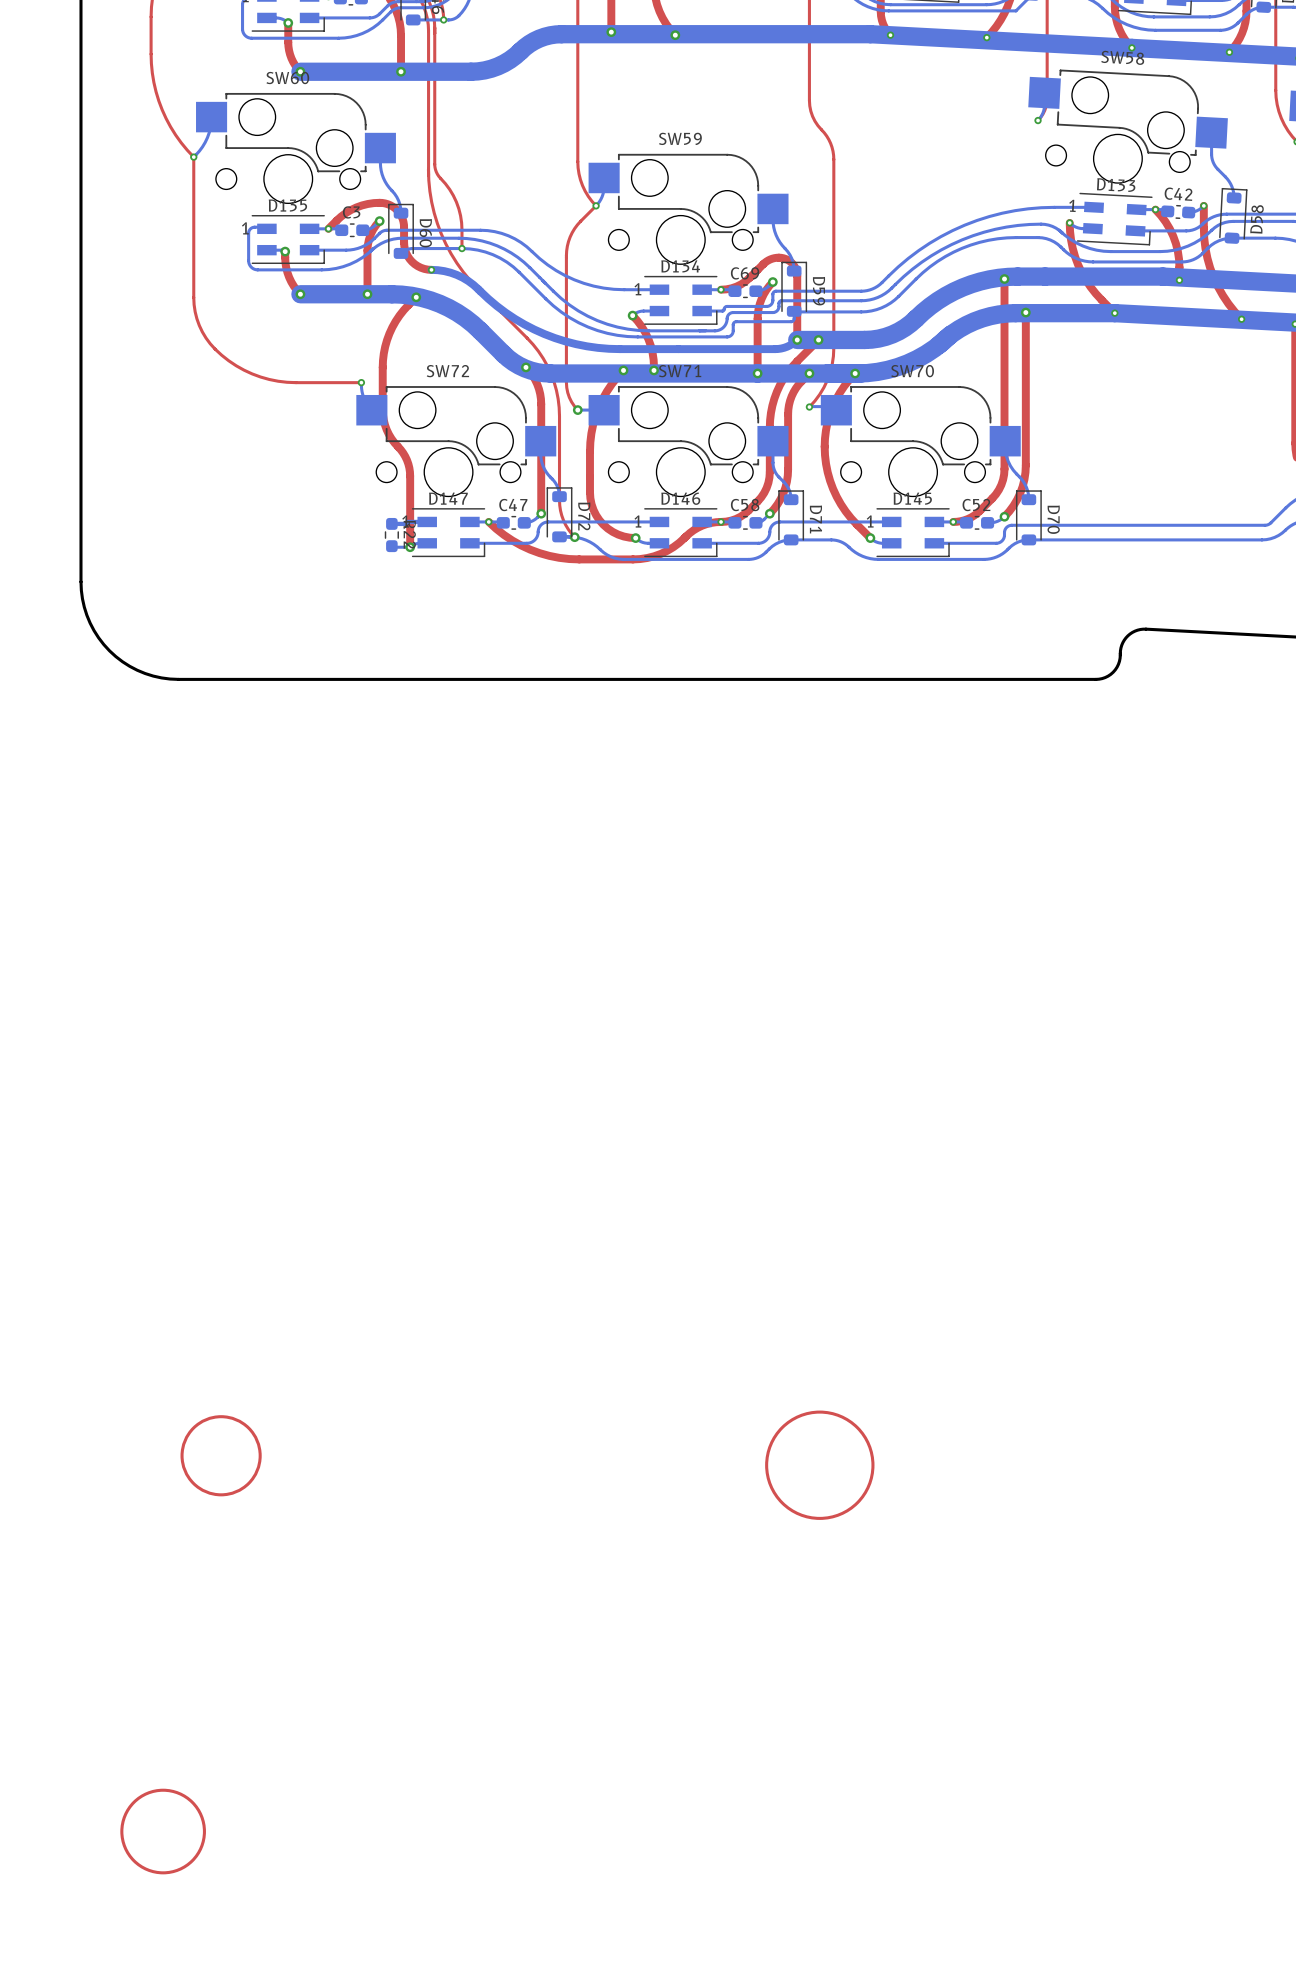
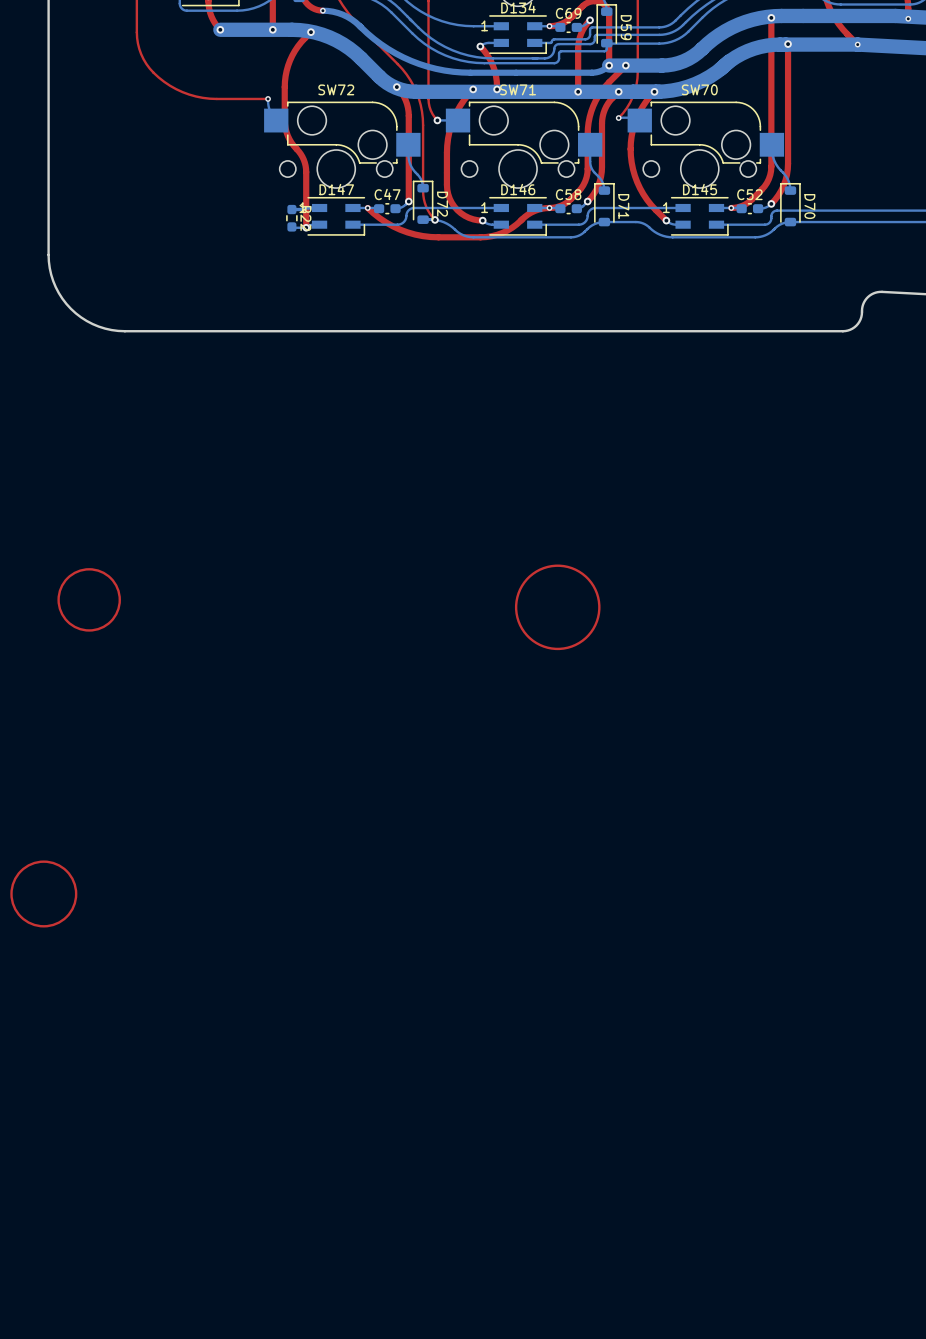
drawing: none -> [514, 564, 601, 651]
drawing: none -> [57, 568, 121, 632]
drawing: none -> [10, 860, 78, 928]
drawing: [765, 1410, 875, 1520] -> none
drawing: [180, 1415, 262, 1497] -> none
drawing: [120, 1788, 206, 1875] -> none

